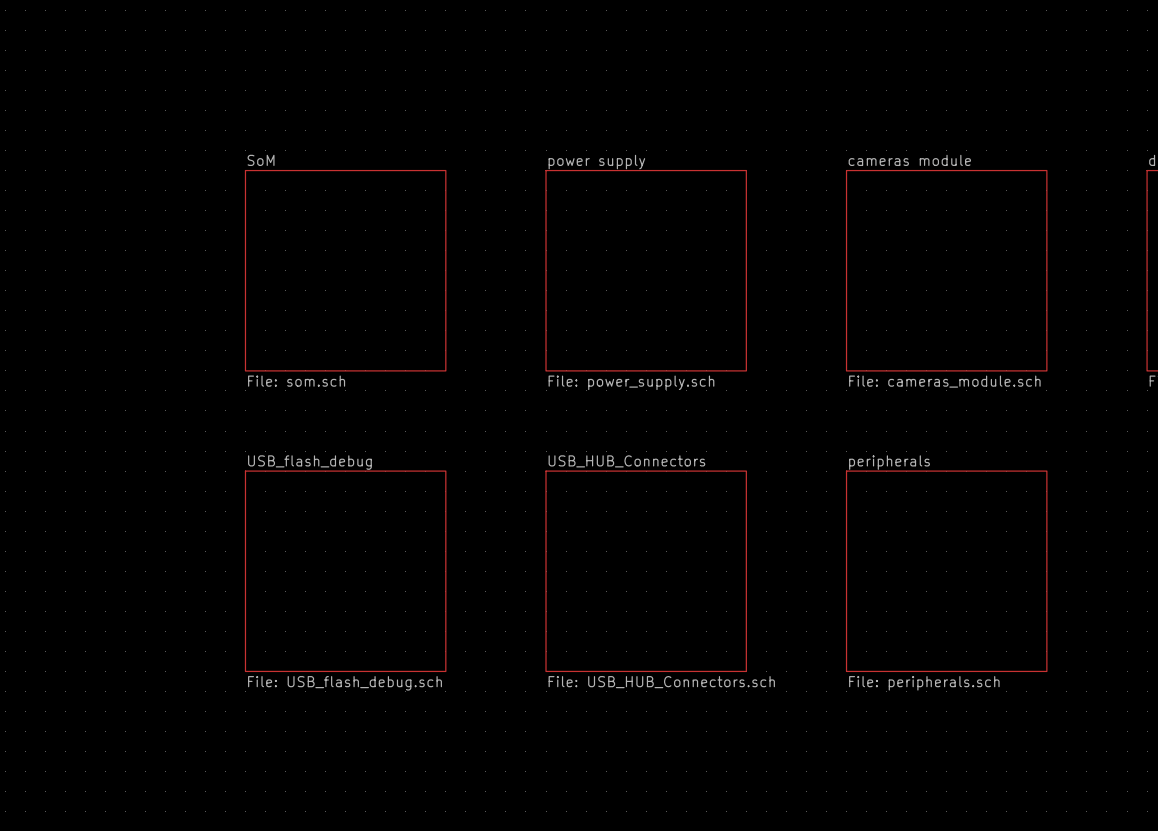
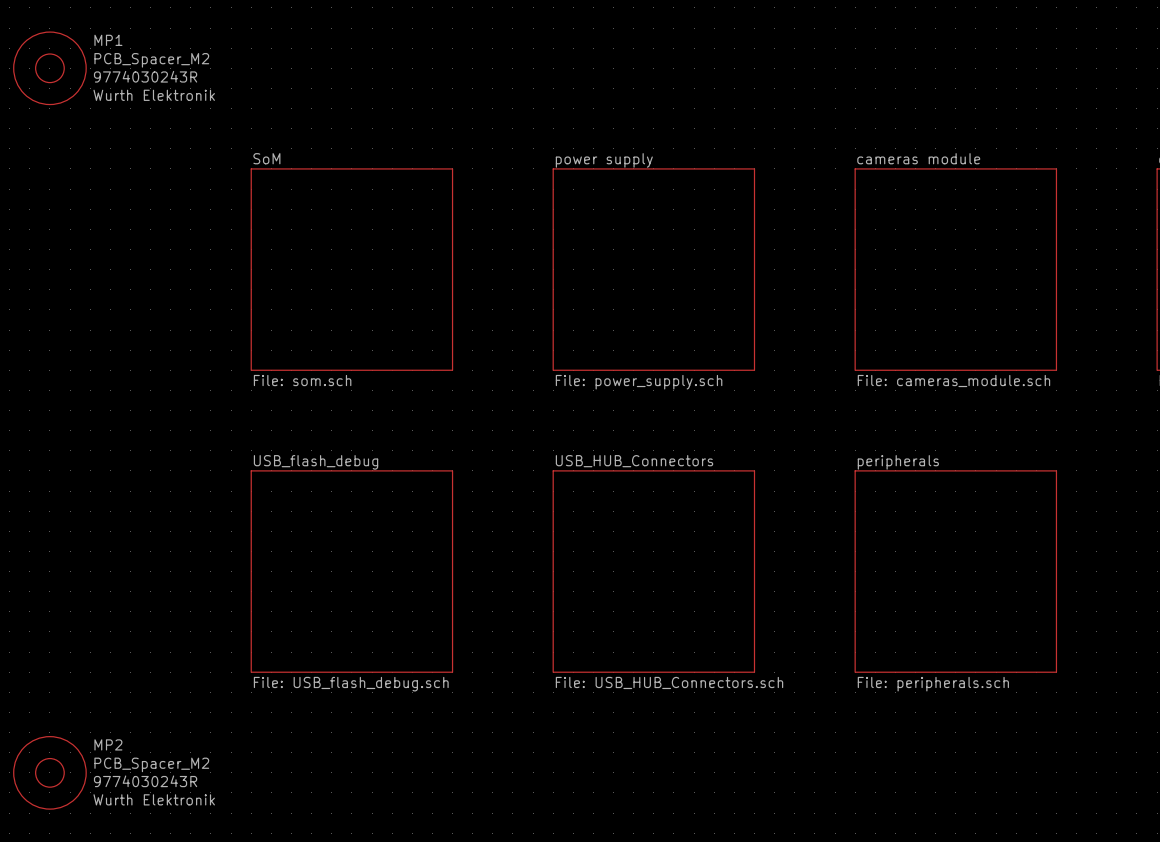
MP1: none -> PCB_Spacer_M2 (49, 68)
MP2: none -> PCB_Spacer_M2 (49, 772)

